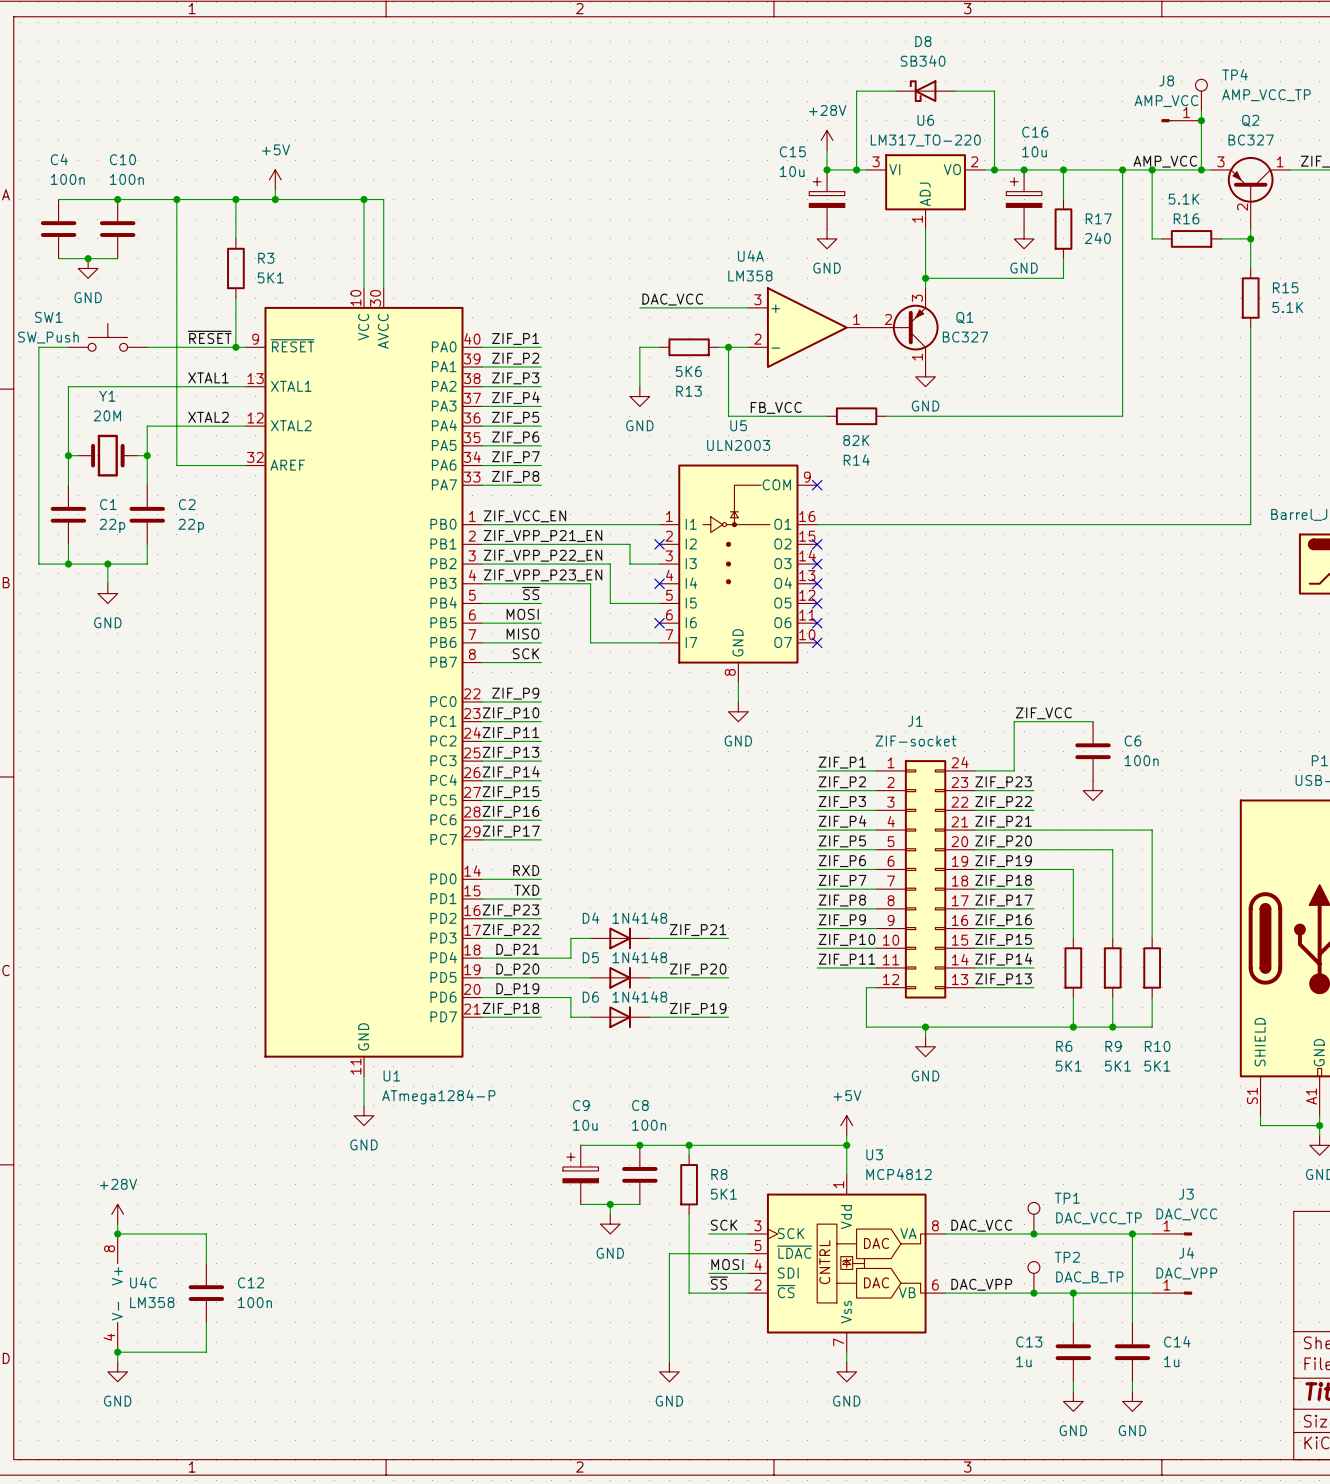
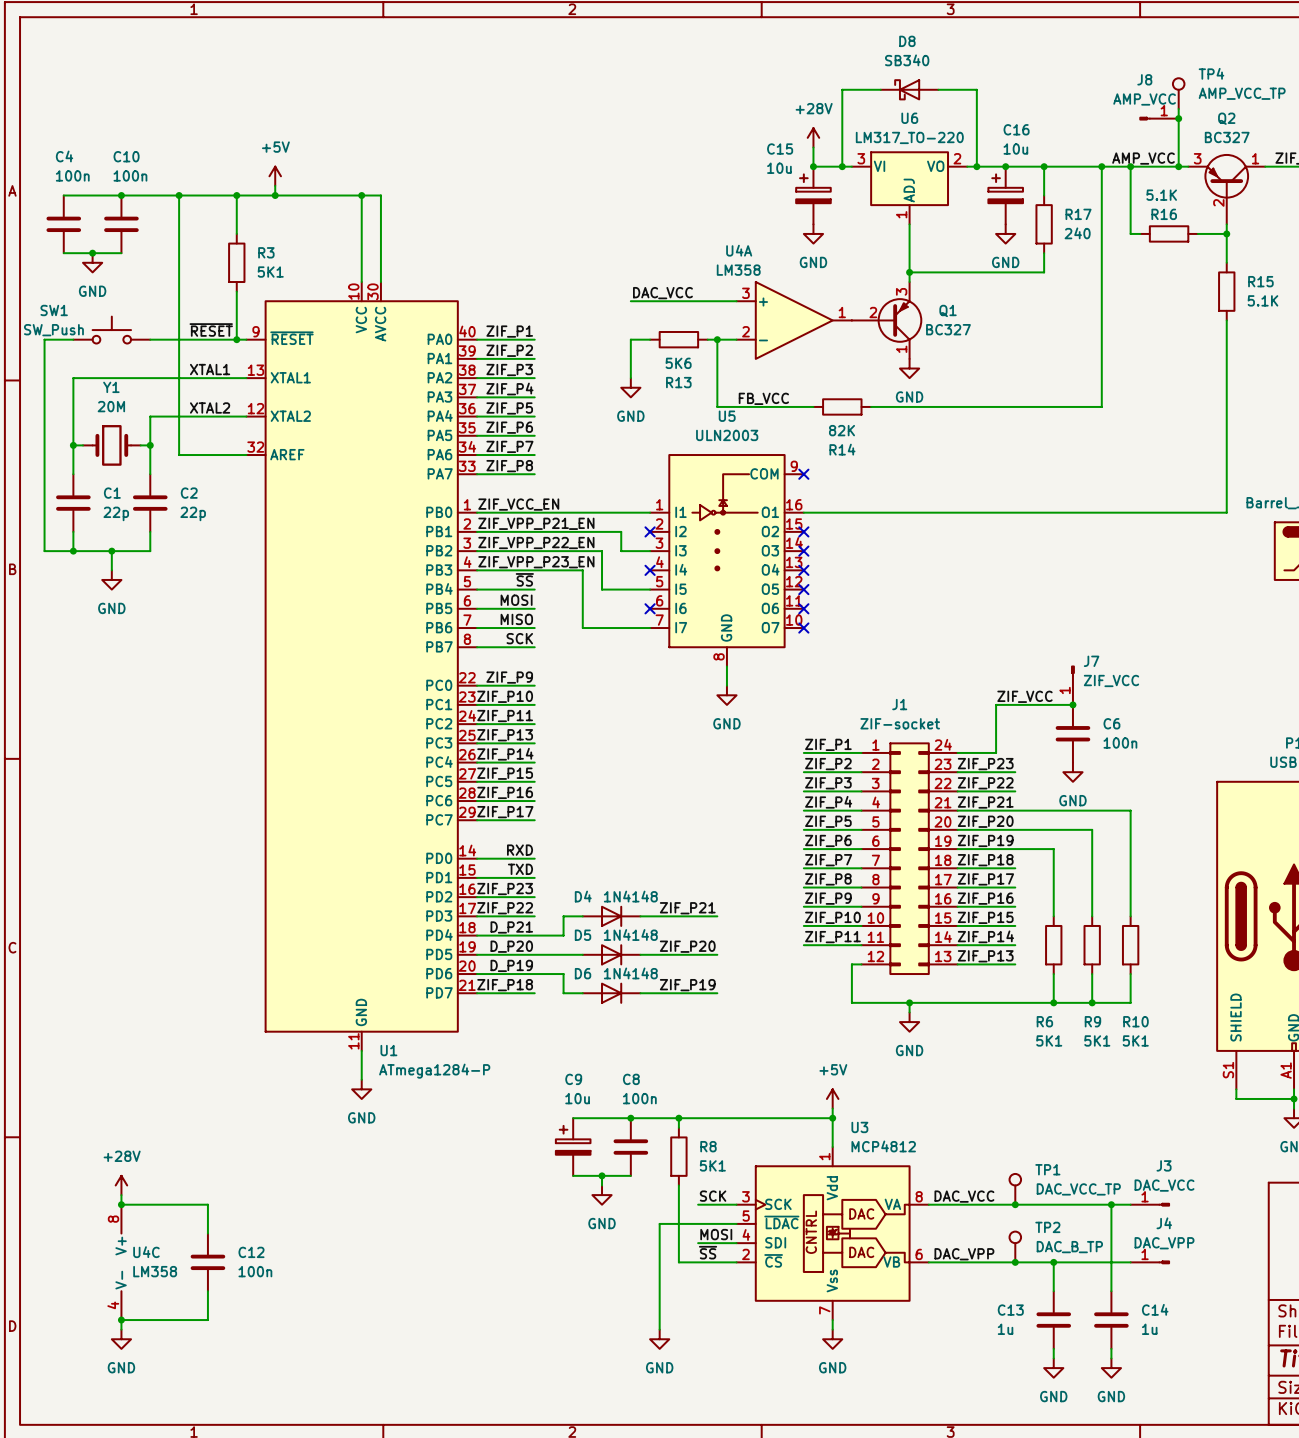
J7: none -> ZIF_VCC (1072, 685)
junction: none -> (1072, 704)
power symbol text: none -> GND (1072, 800)

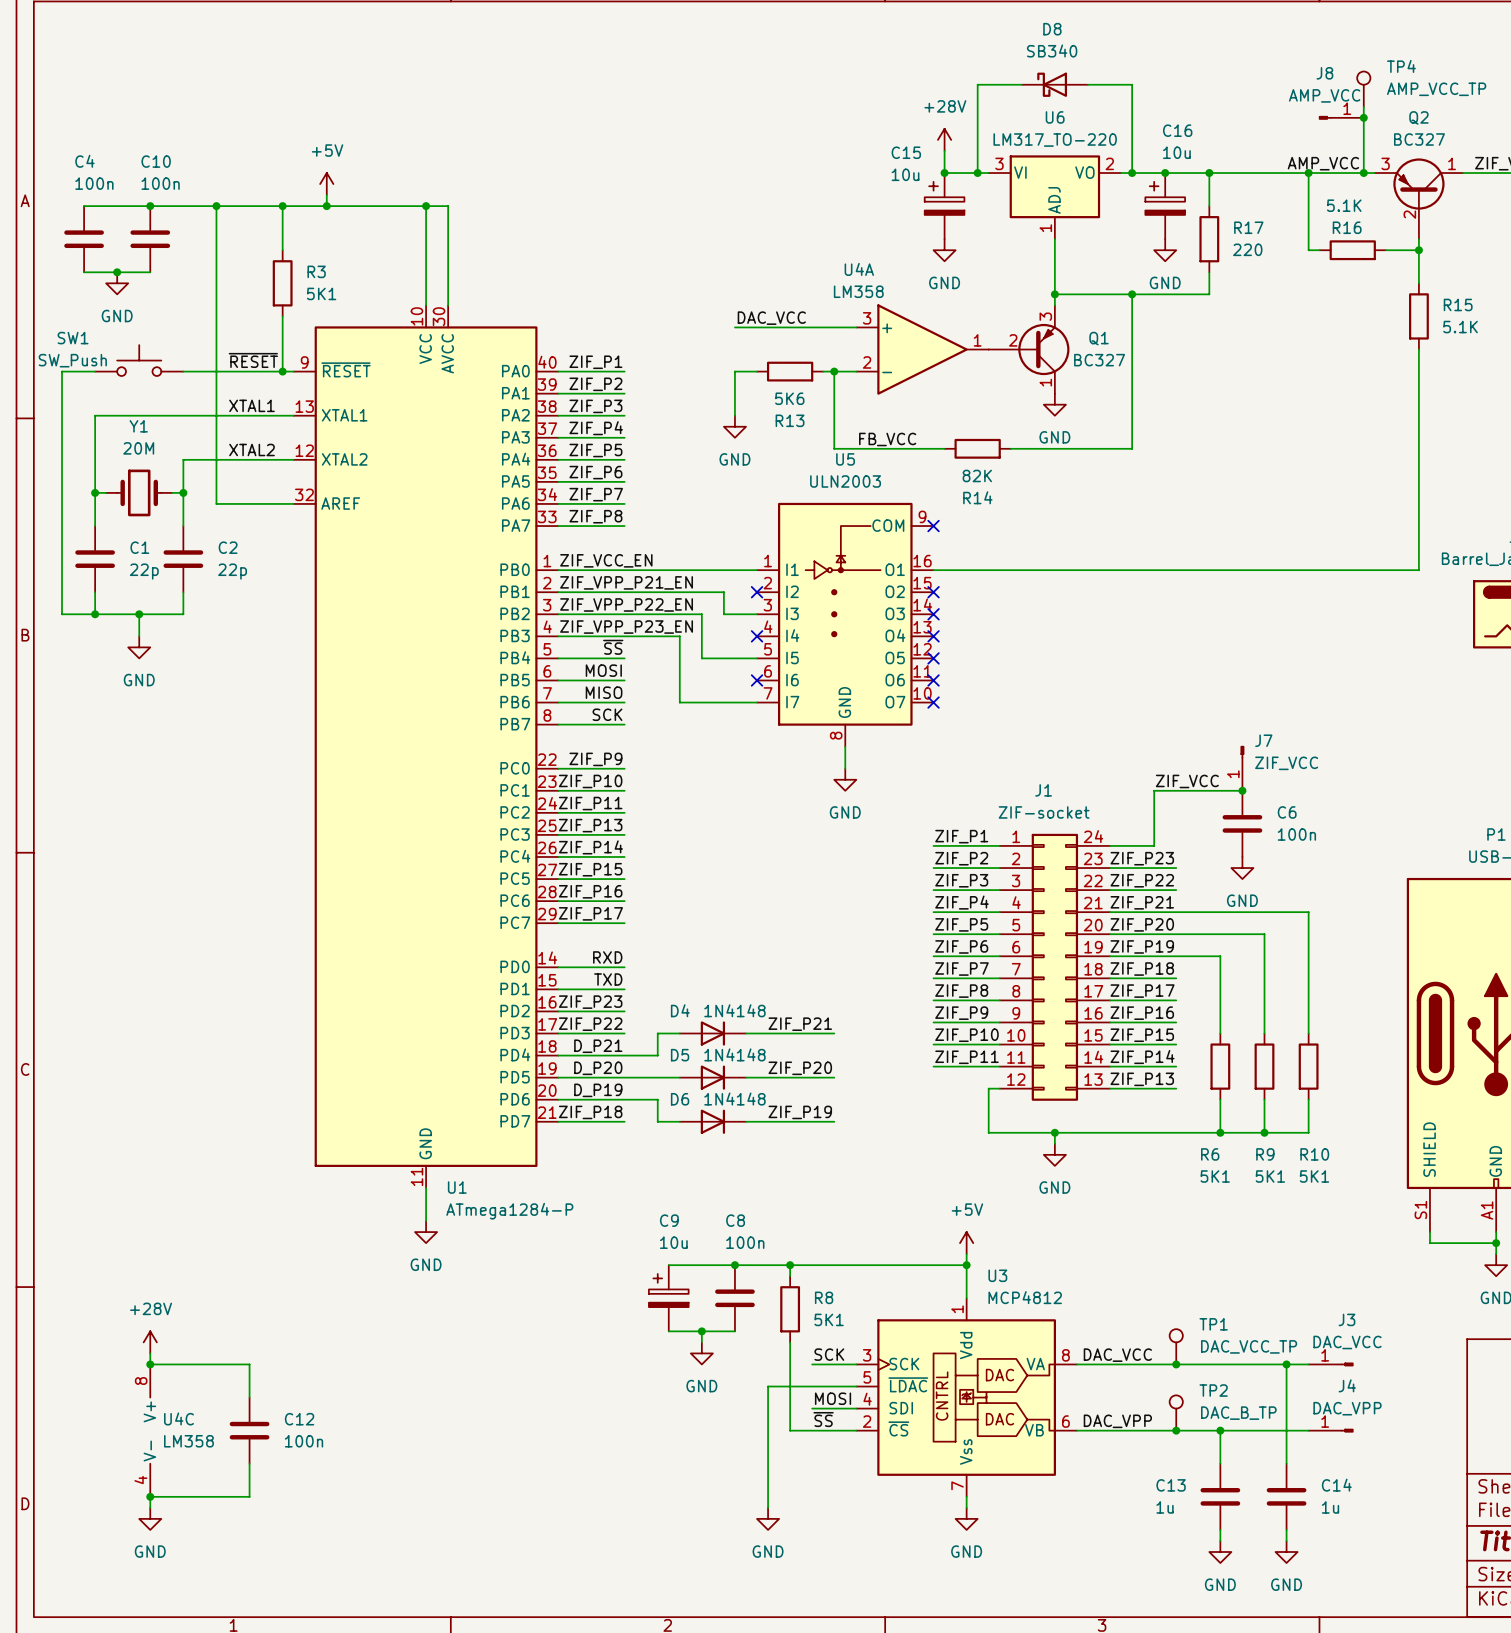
wire: (1101, 166) (1101, 406) (976, 406) -> (1132, 294) (1132, 448)
junction: (1101, 166) -> none
R17 value: 240 (1077, 233) -> 220 (1247, 249)
junction: none -> (1132, 294)

